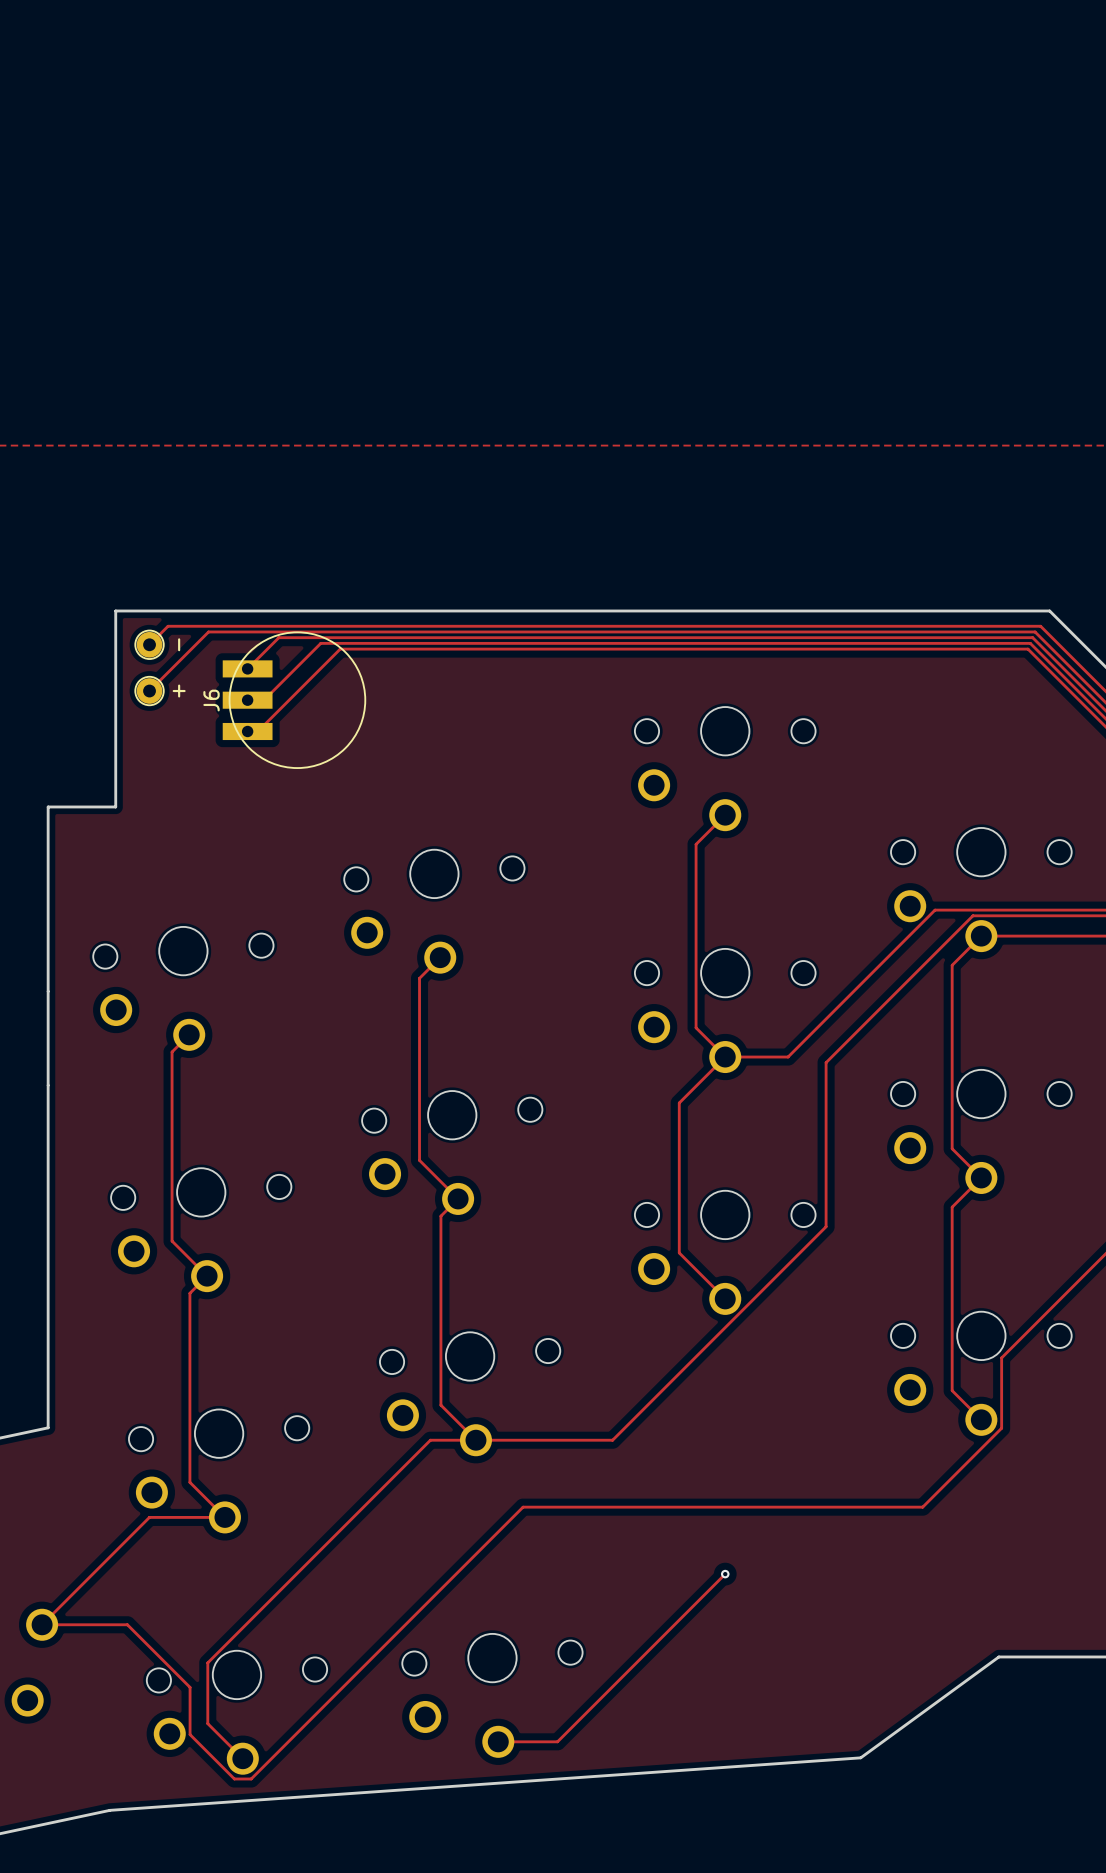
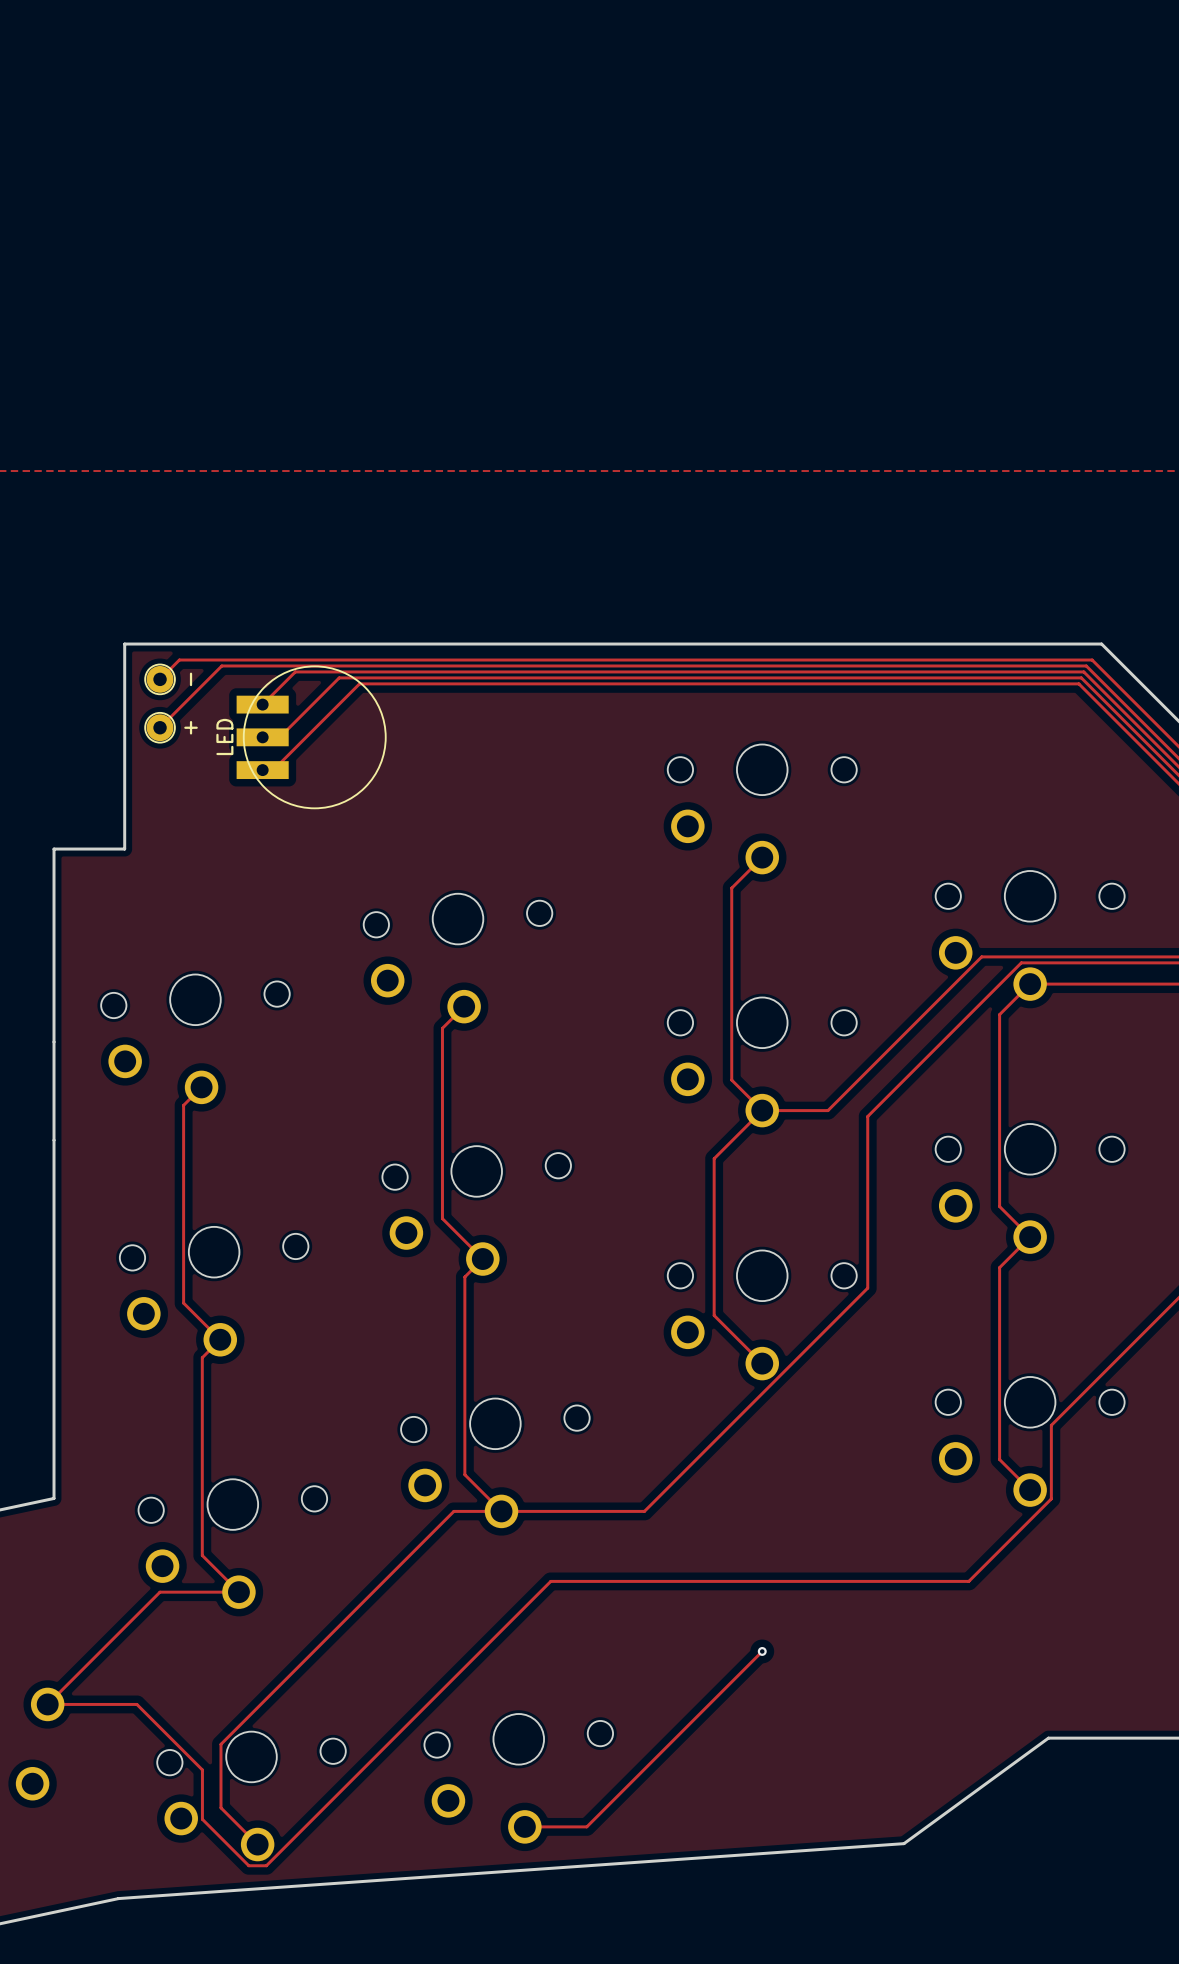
J6 name: J6 (211, 700) -> LED (224, 736)

